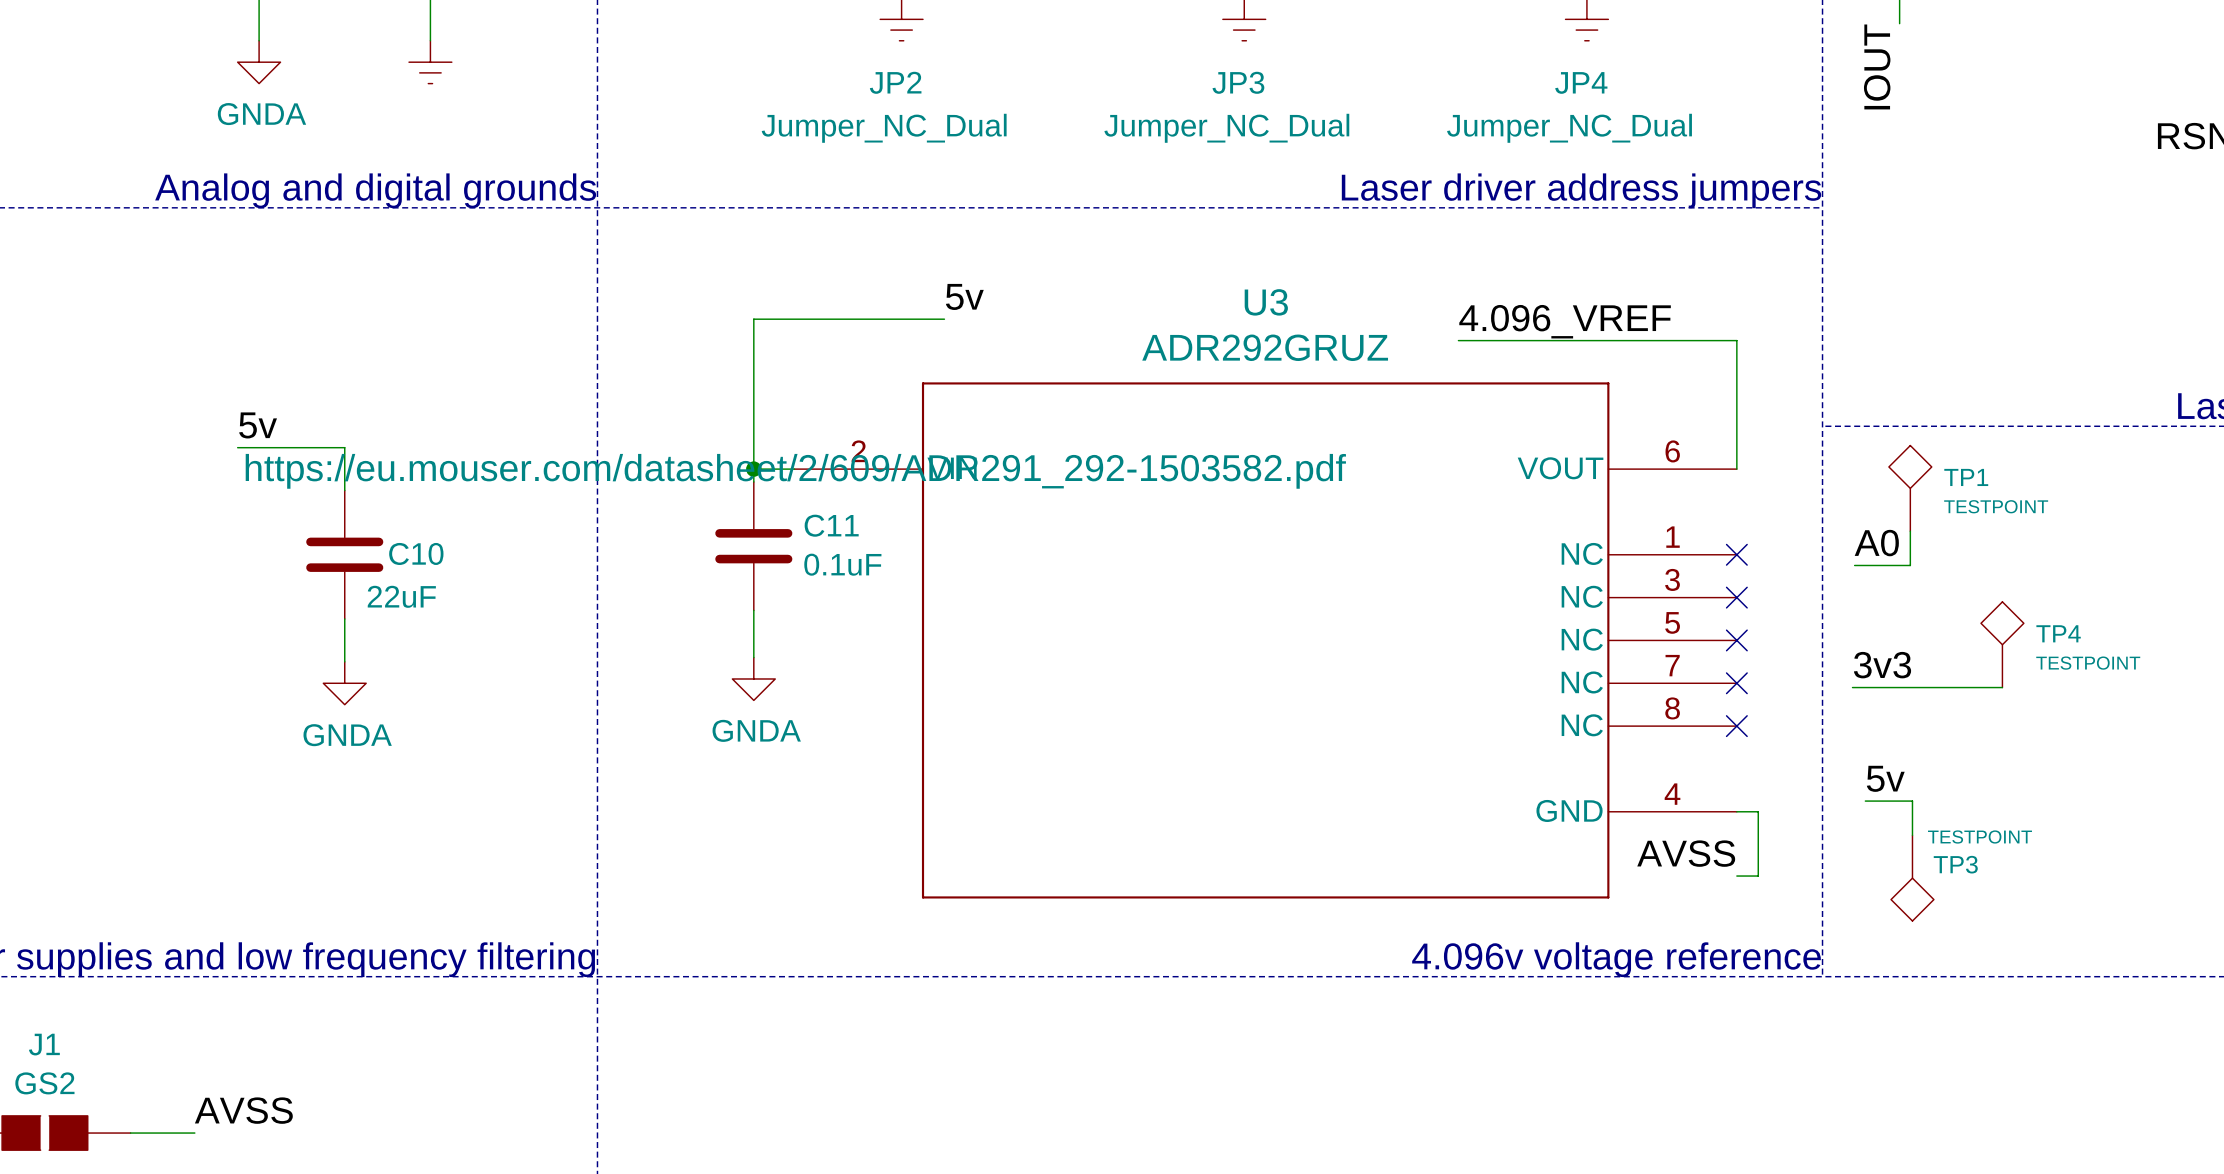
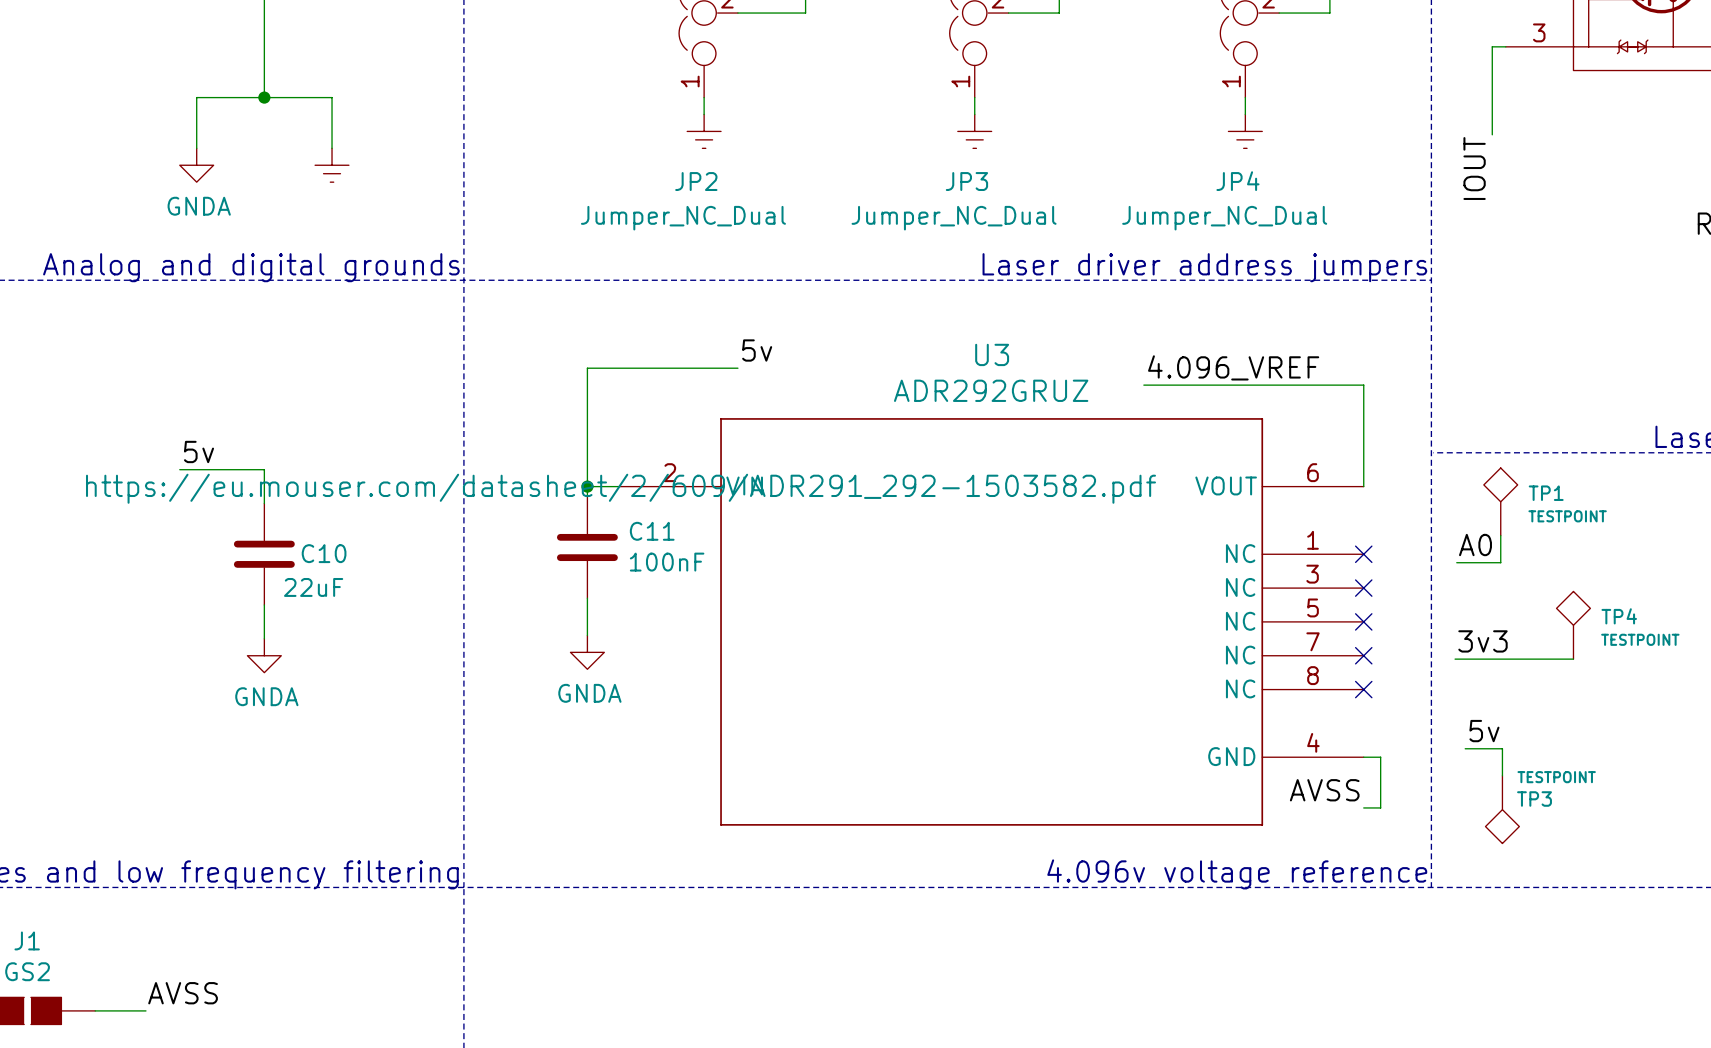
C11 value: 0.1uF (842, 564) -> 100nF (667, 562)

